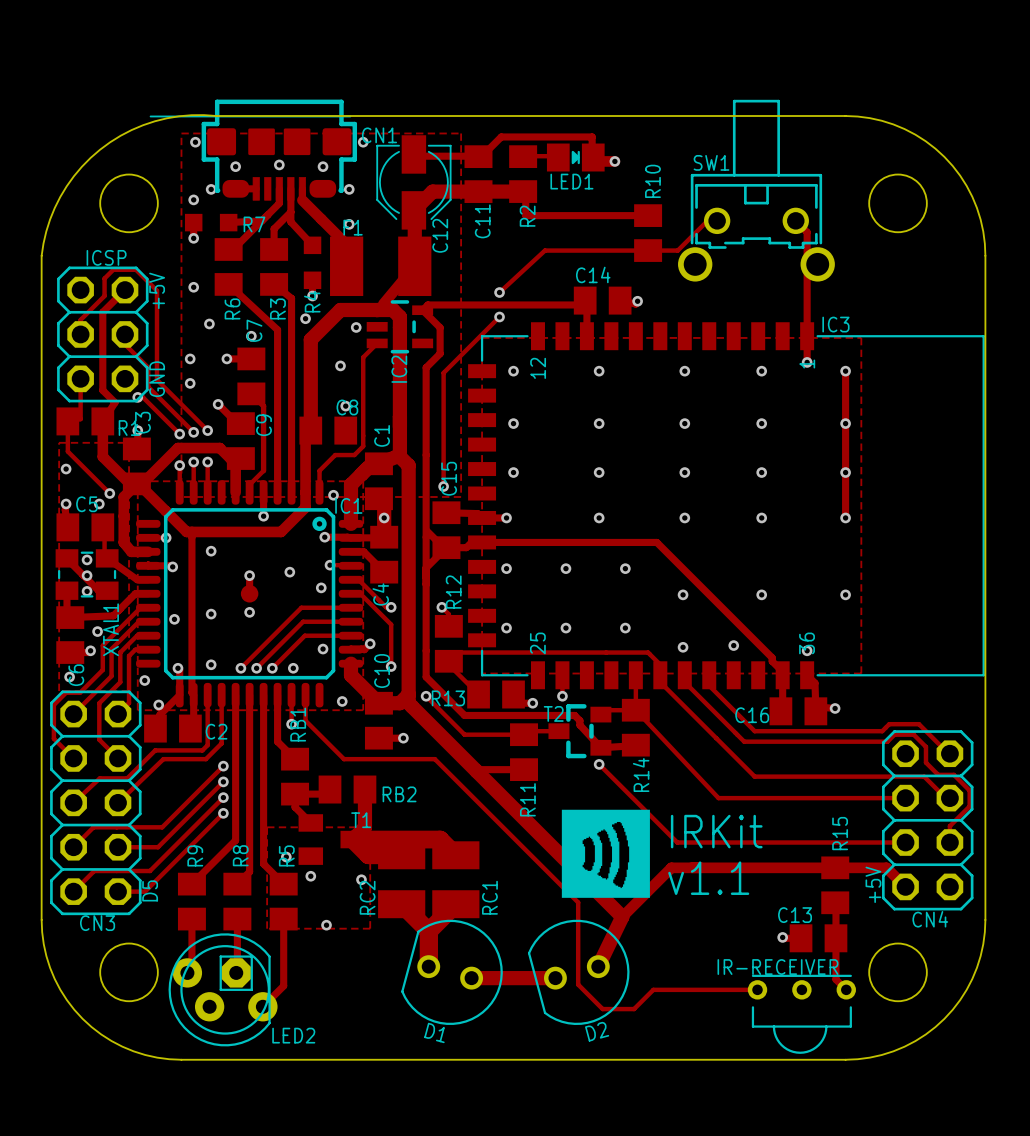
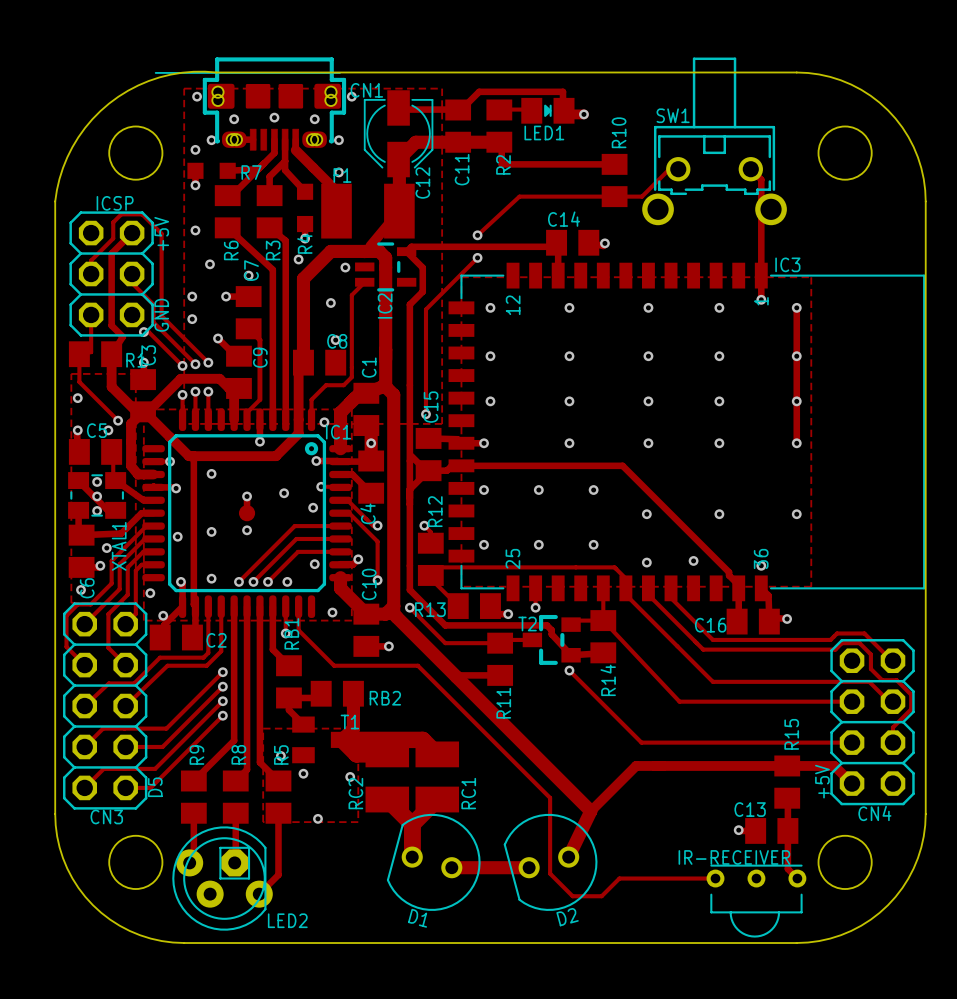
CN1 footprint: [150, 99, 358, 201] -> [155, 57, 347, 151]
drawing: [561, 809, 650, 898] -> none
text: IRKit (716, 831) -> none
text: v1.1 (708, 878) -> none

